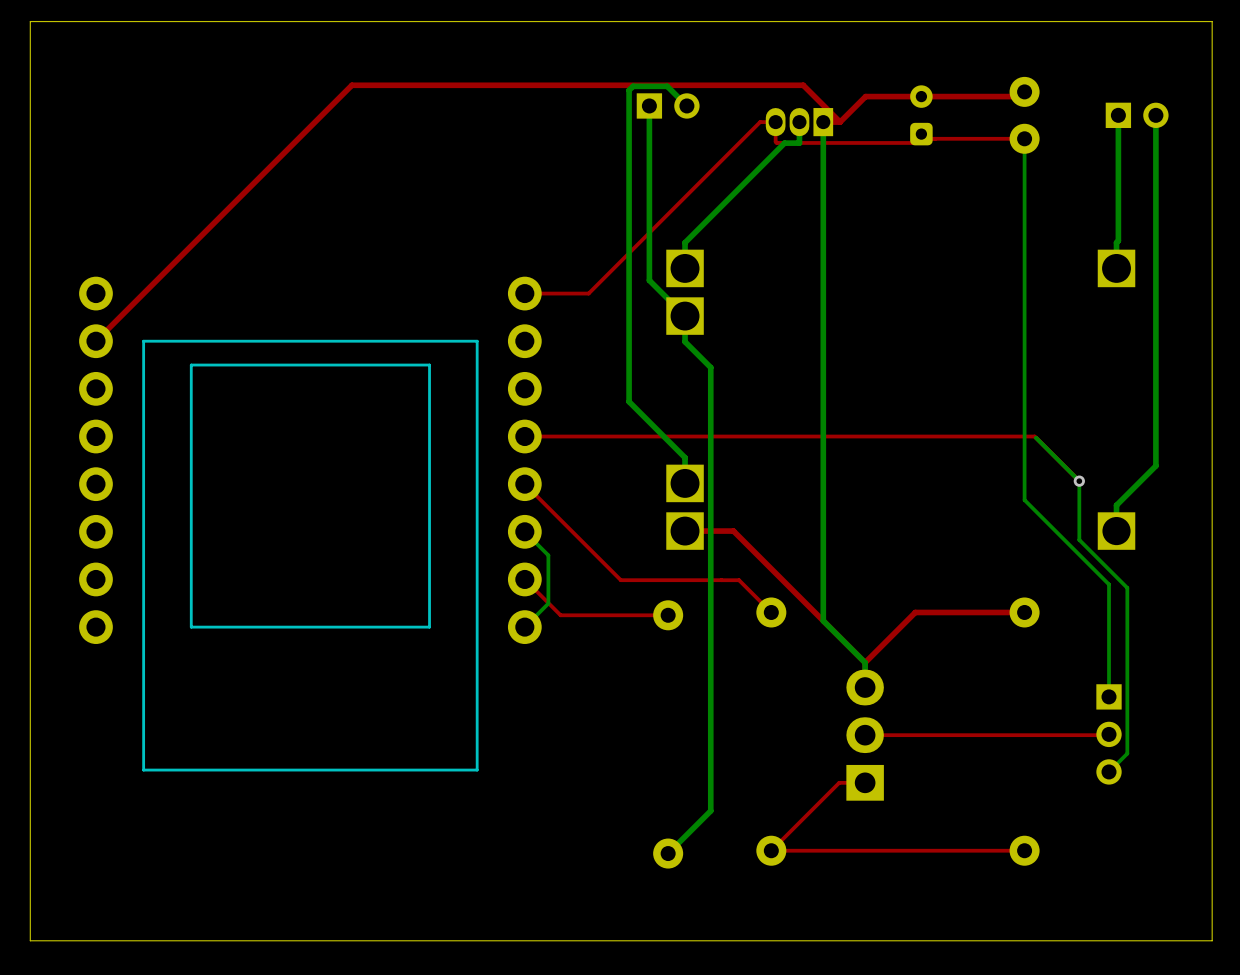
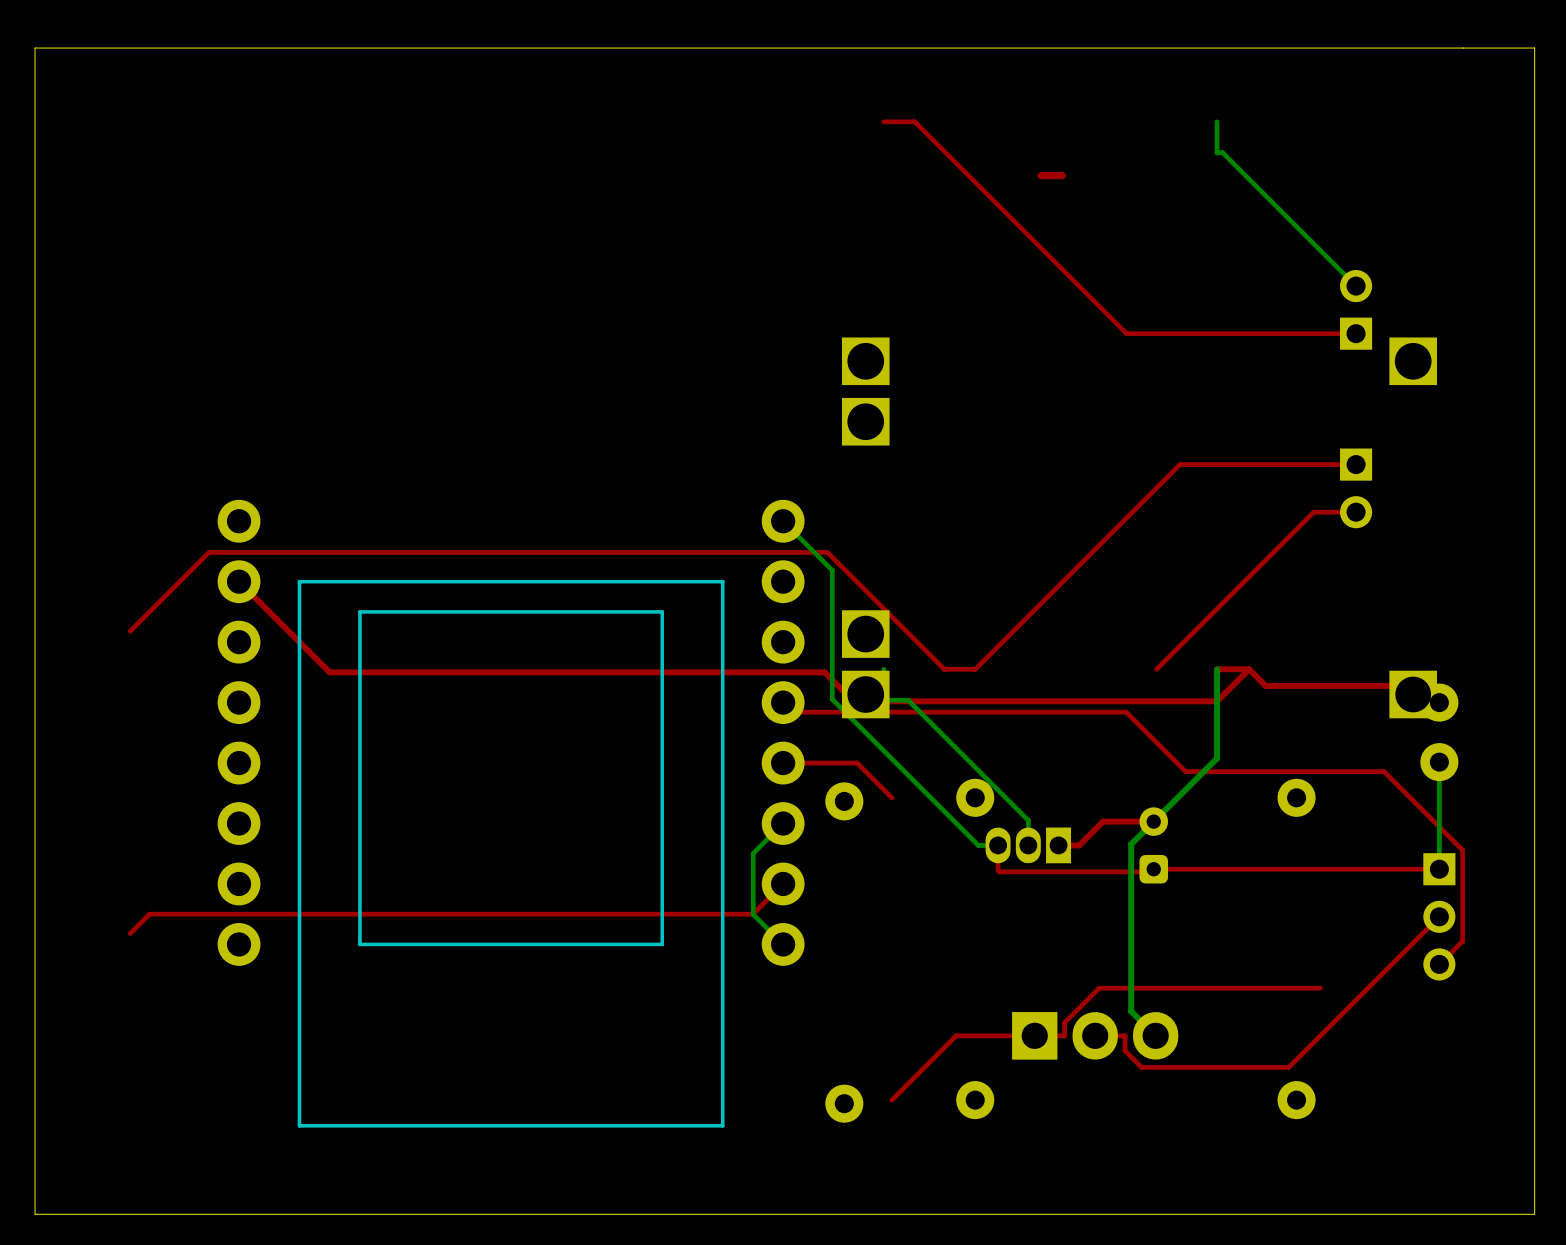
top track: none -> (883, 121) (914, 121) (1126, 333) (1356, 333)
bottom track: none -> (1217, 121) (1217, 152) (1222, 152) (1356, 286)
top track: (1024, 91) (1019, 96) (865, 96) (840, 122) (803, 85) (351, 85) (95, 341) -> none
bottom track: (649, 105) (649, 280) (685, 316) (685, 341) (710, 367) (710, 810) (668, 853) -> none
part: (668, 105) -> none
bottom track: (686, 105) (667, 86) (633, 86) (629, 90) (629, 401) (685, 457) (685, 483) -> none
part: (921, 115) -> none
part position: (1024, 115) -> (1439, 732)
bottom track: (1118, 115) (1118, 240) (1116, 242) (1116, 268) -> none
part rotation: 0° (1137, 115) -> 90° counterclockwise (1356, 309)
part position: (1137, 115) -> (1356, 309)
bottom track: (1155, 115) (1155, 465) (1116, 505) (1116, 531) -> none
bottom track: (799, 122) (799, 143) (784, 143) (685, 242) (685, 268) -> none
part: (799, 122) -> none
bottom track: (823, 122) (823, 620) (865, 662) (865, 687) -> none
bottom track: (1024, 138) (1024, 500) (1109, 584) (1109, 696) -> none
top track: (1024, 138) (926, 138) (921, 134) (912, 142) (776, 142) (775, 122) (760, 122) (588, 293) (524, 293) -> none
top track: none -> (1356, 464) (1179, 464) (975, 669) (944, 669) (827, 552) (209, 552) (130, 631)
part: none -> (1356, 488)
top track: none -> (1356, 512) (1313, 512) (1156, 669)
bottom track: none -> (783, 521) (832, 570) (832, 699) (978, 845) (998, 845)
top track: (524, 436) (1034, 436) (1079, 481) -> none
bottom track: (1036, 437) (1079, 481) (1079, 539) (1127, 587) (1127, 753) (1109, 771) -> none
top track: none -> (239, 581) (329, 672) (824, 672) (853, 701) (1217, 701) (1249, 669)
via: (1079, 481) -> none
top track: (524, 484) (620, 580) (739, 580) (771, 612) -> none
bottom track: none -> (883, 669) (883, 700) (908, 700) (1028, 820) (1028, 845)
bottom track: none -> (1217, 669) (1217, 758) (1131, 844) (1131, 1011) (1155, 1035)
top track: none -> (1249, 669) (1265, 685) (1422, 685) (1439, 702)
top track: none -> (1249, 669) (1217, 669)
part position: (310, 524) -> (511, 813)
bottom track: (524, 531) (548, 555) (548, 603) (524, 627) -> none
top track: (685, 531) (733, 531) (865, 662) -> none
top track: none -> (783, 702) (792, 712) (1126, 712) (1185, 771) (1384, 771) (1462, 850) (1462, 941) (1439, 964)
top track: (524, 579) (560, 615) (668, 615) -> none
bottom track: none -> (1439, 762) (1439, 869)
top track: none -> (783, 763) (857, 763) (891, 797)
top track: (1024, 612) (915, 612) (865, 662) -> none
top track: none -> (1153, 821) (1103, 821) (1079, 845) (1058, 845)
bottom track: none -> (783, 823) (753, 853) (753, 914) (783, 944)
top track: none -> (998, 845) (999, 871) (1151, 871) (1153, 869) (1439, 869)
part: none -> (1028, 845)
part: none -> (1153, 845)
top track: none -> (783, 883) (752, 914) (149, 914) (130, 933)
top track: none -> (1439, 916) (1403, 952)
part position: (1109, 734) -> (1439, 916)
part rotation: 0° (865, 735) -> 90° clockwise (1095, 1035)
top track: (1108, 735) (865, 735) -> (1402, 953) (1288, 1067) (1141, 1067) (1125, 1050) (1125, 1035) (1095, 1035)
top track: none -> (1320, 988) (1099, 988) (1064, 1022) (1064, 1035) (956, 1035) (891, 1100)
top track: (865, 782) (839, 782) (771, 850) (1024, 850) -> none

